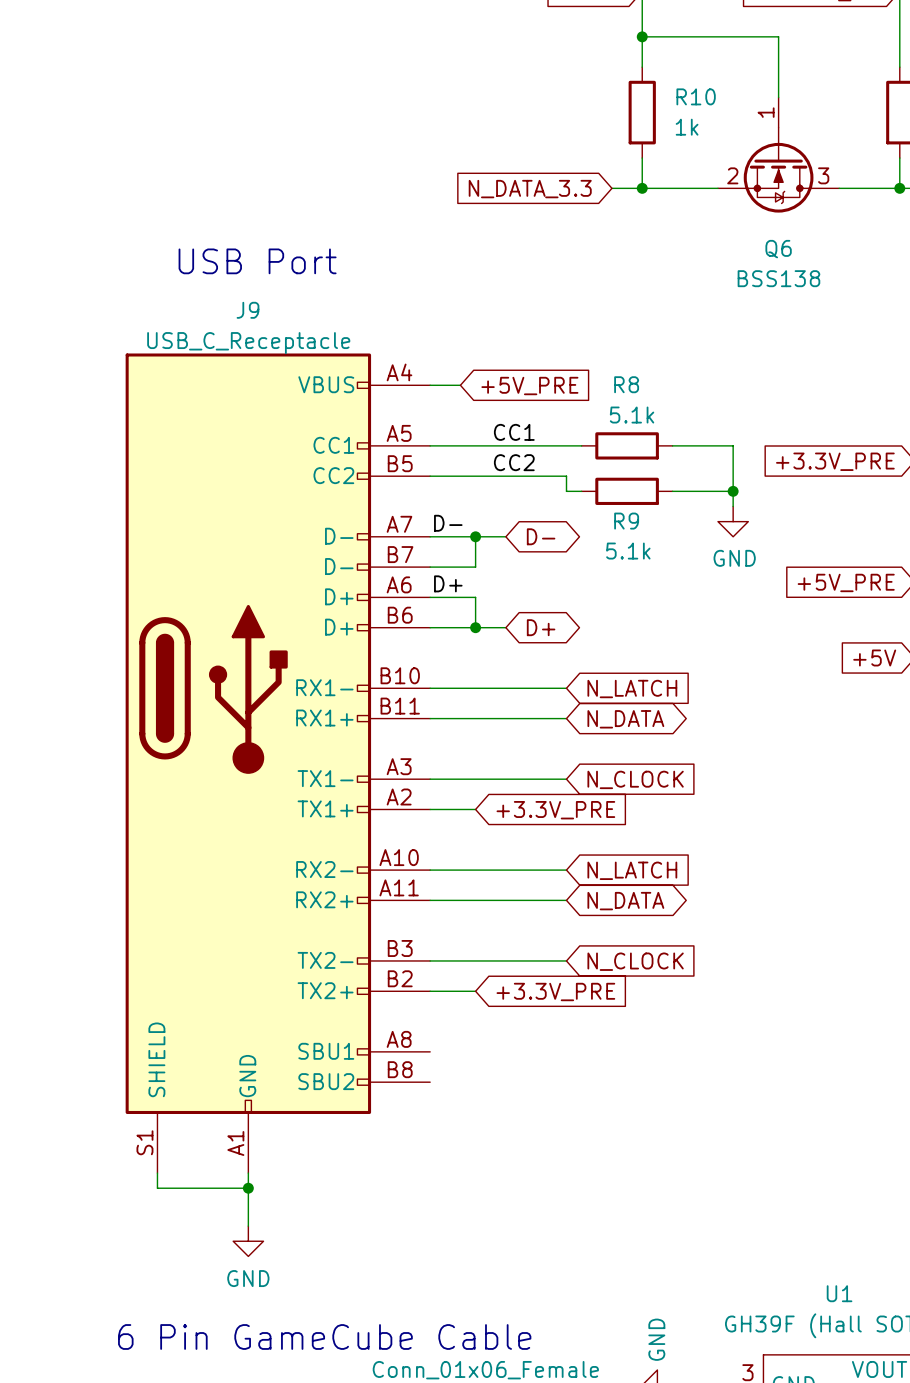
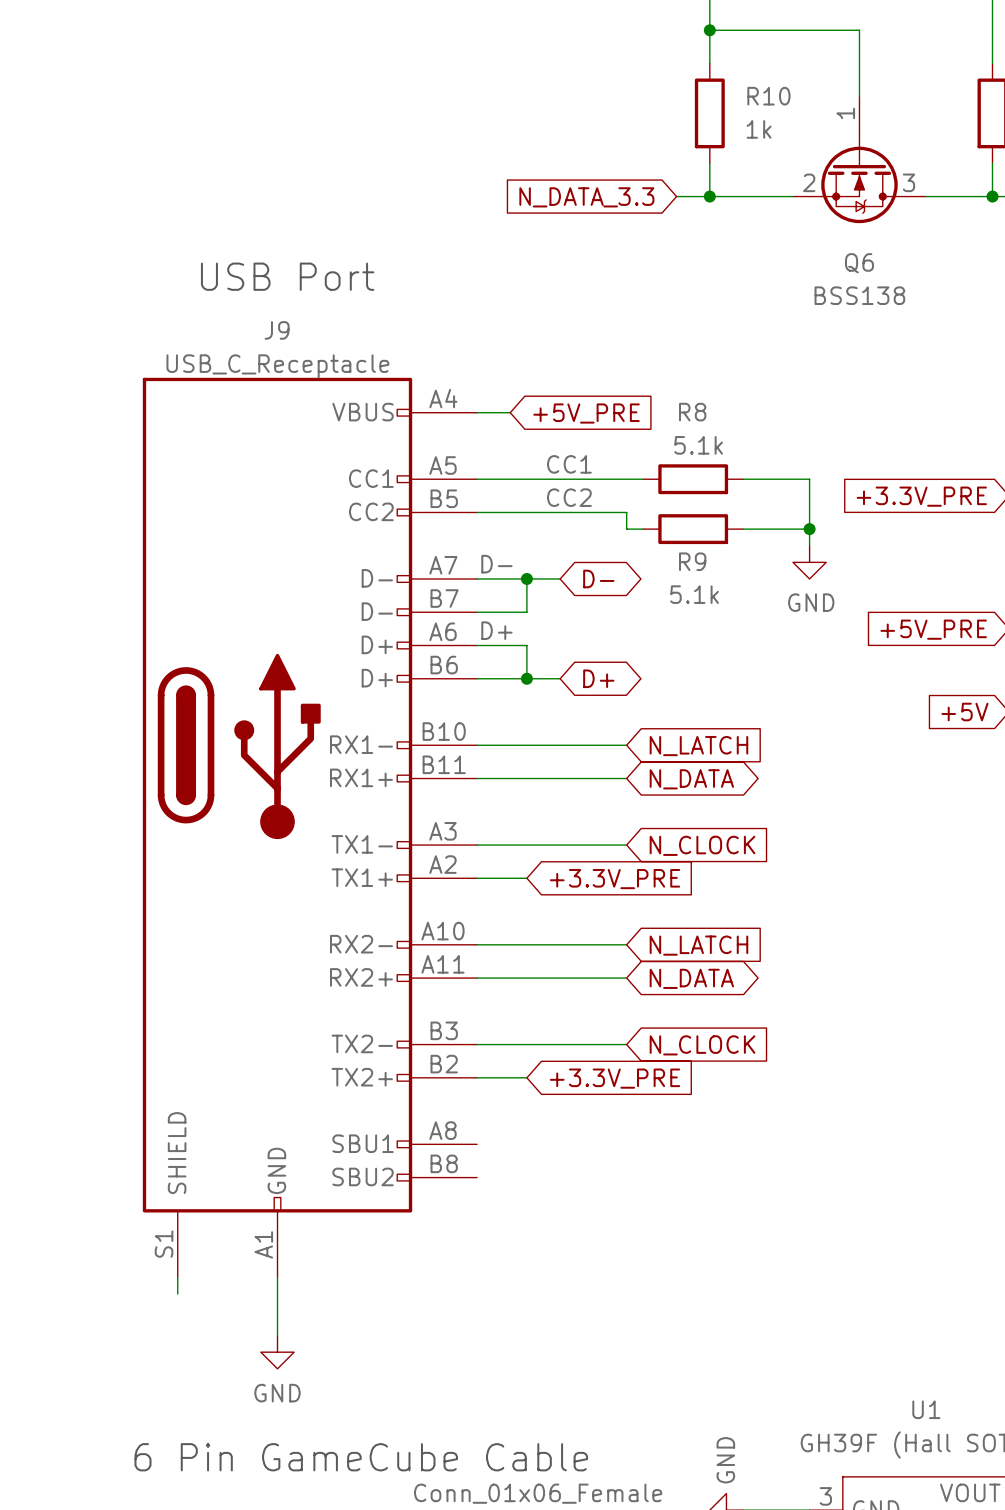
wire: (157, 1188) (248, 1188) -> none
junction: (248, 1188) -> none

